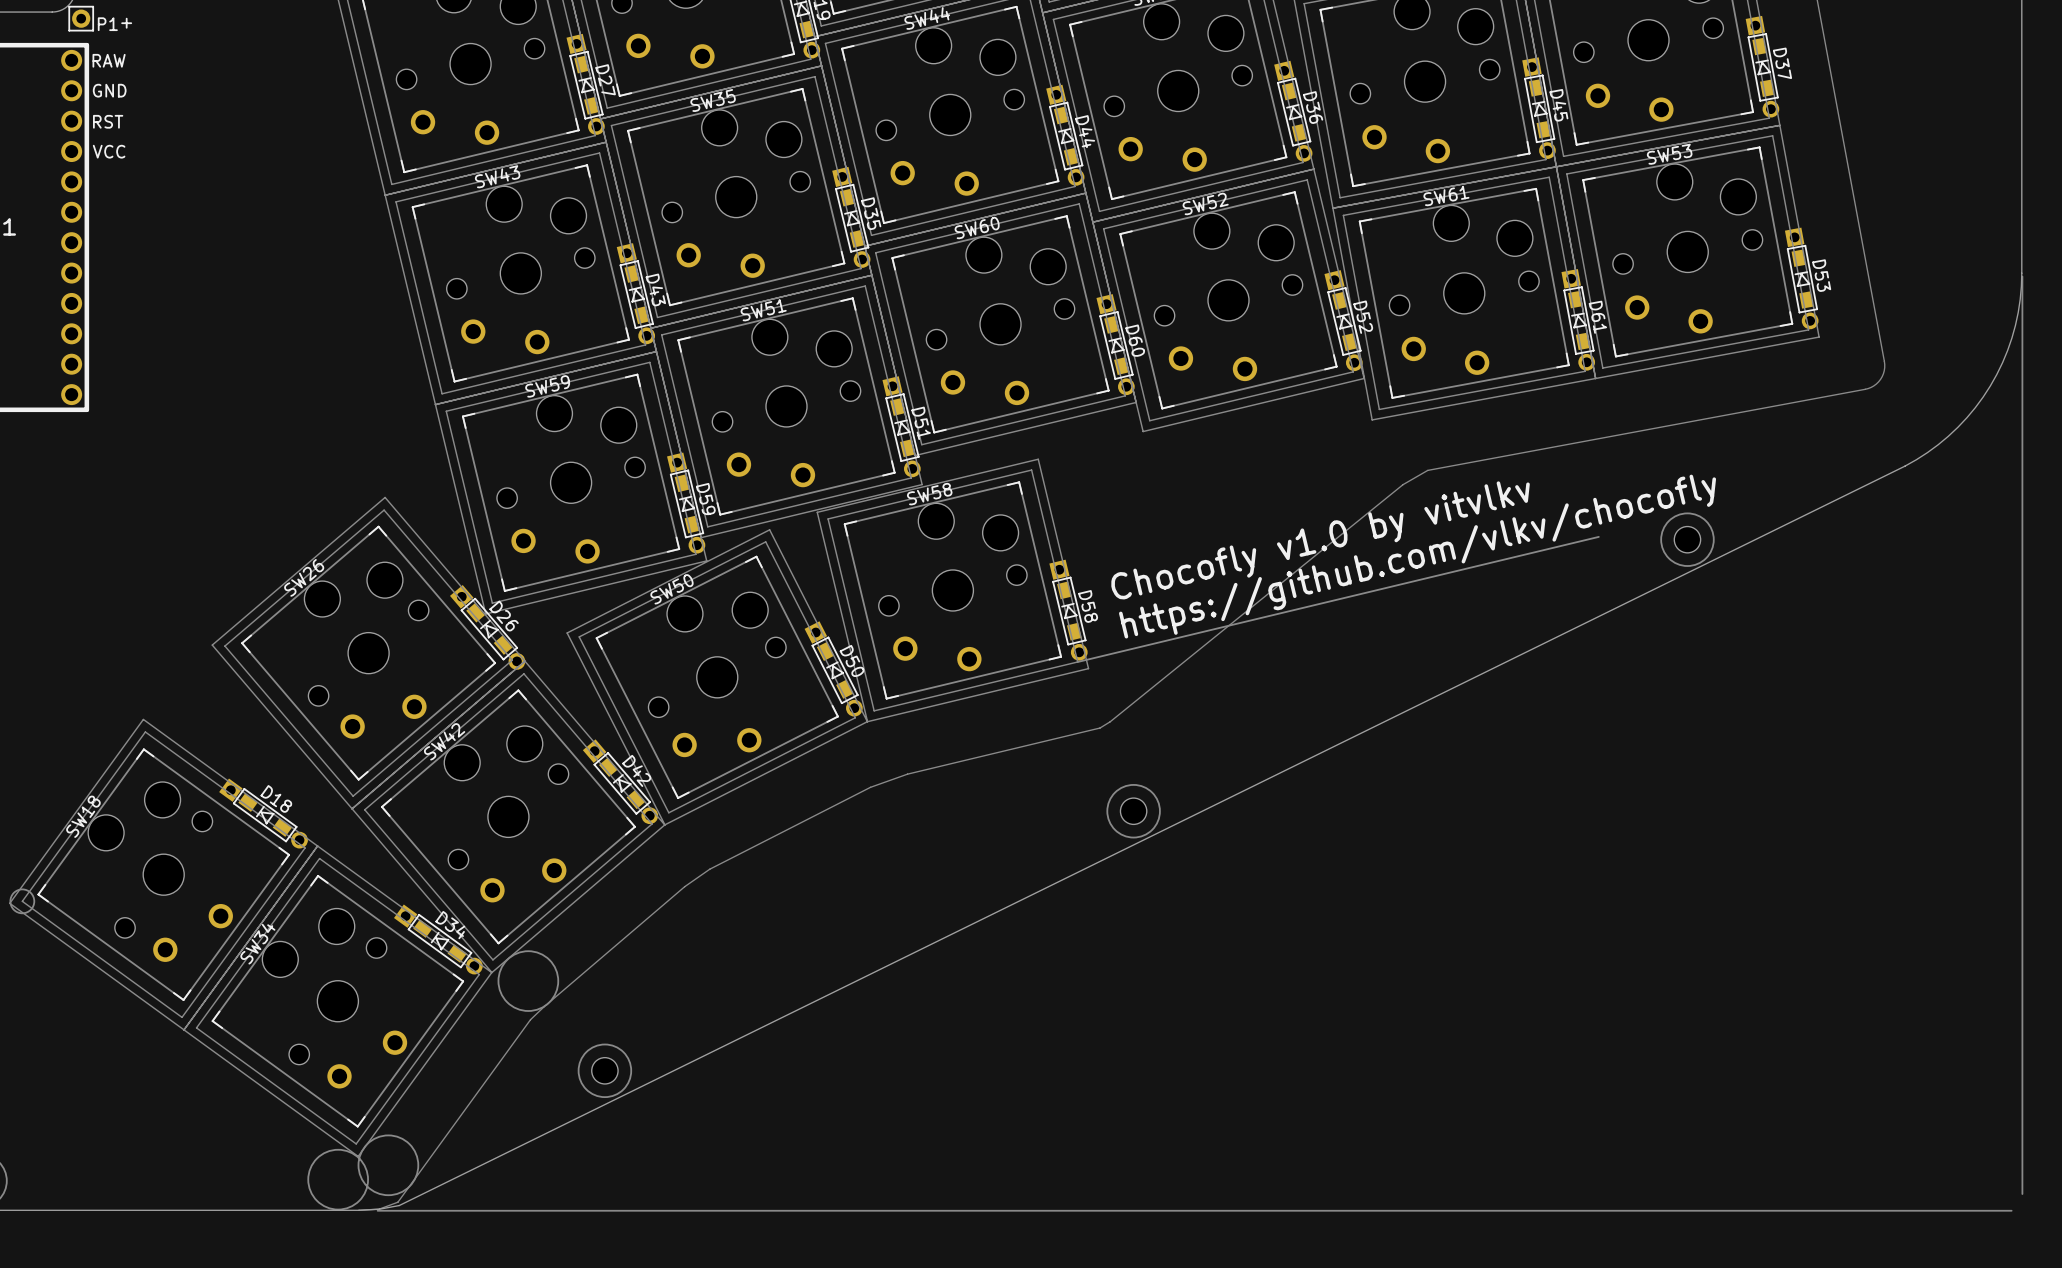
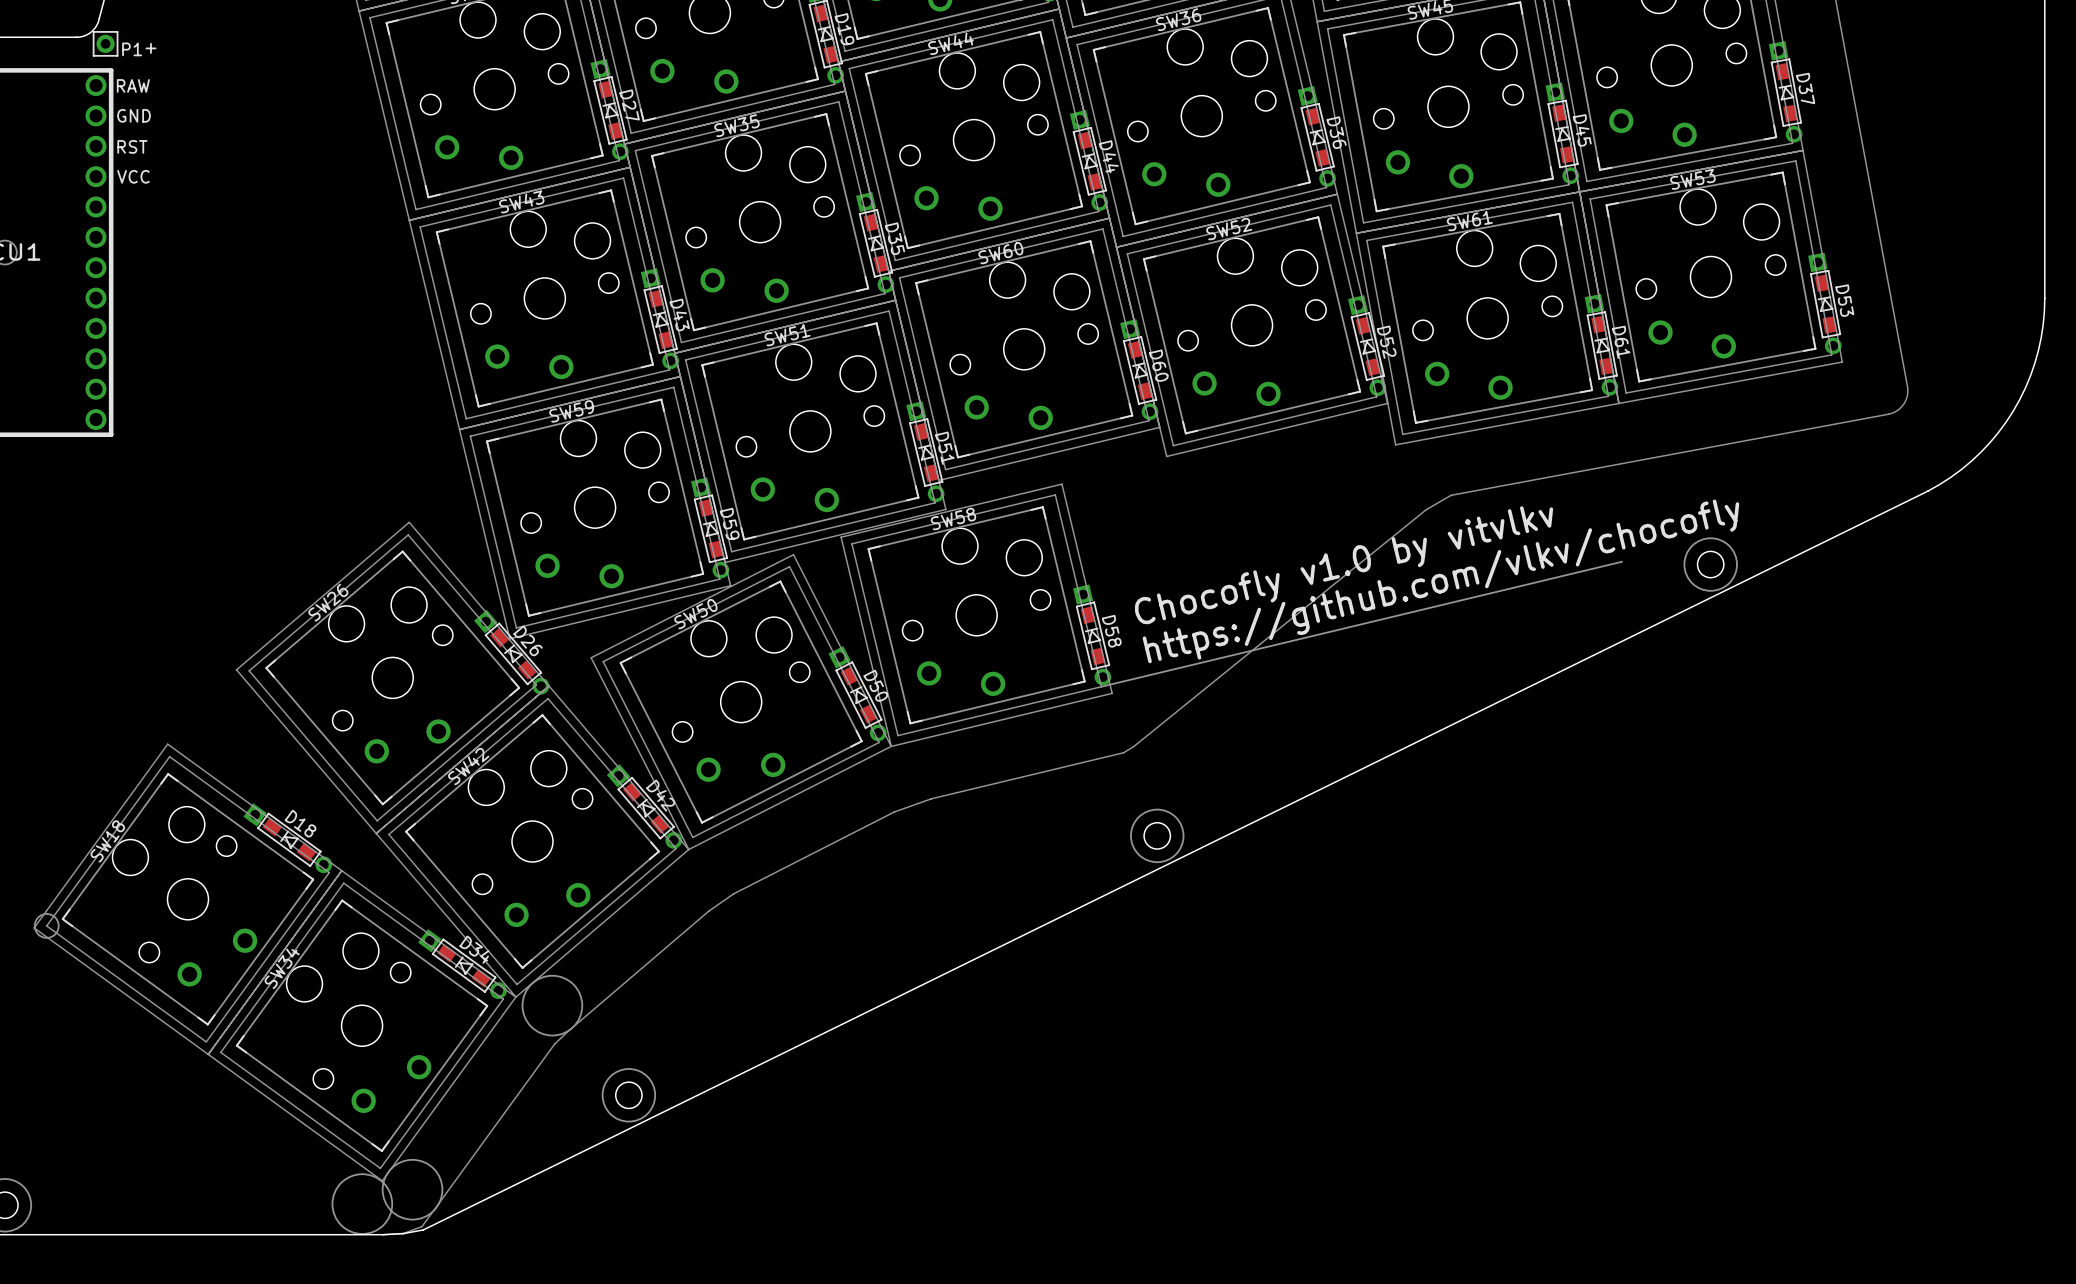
line: (2022, 276) (2022, 1194) -> none
line: (377, 1210) (2011, 1210) -> none

